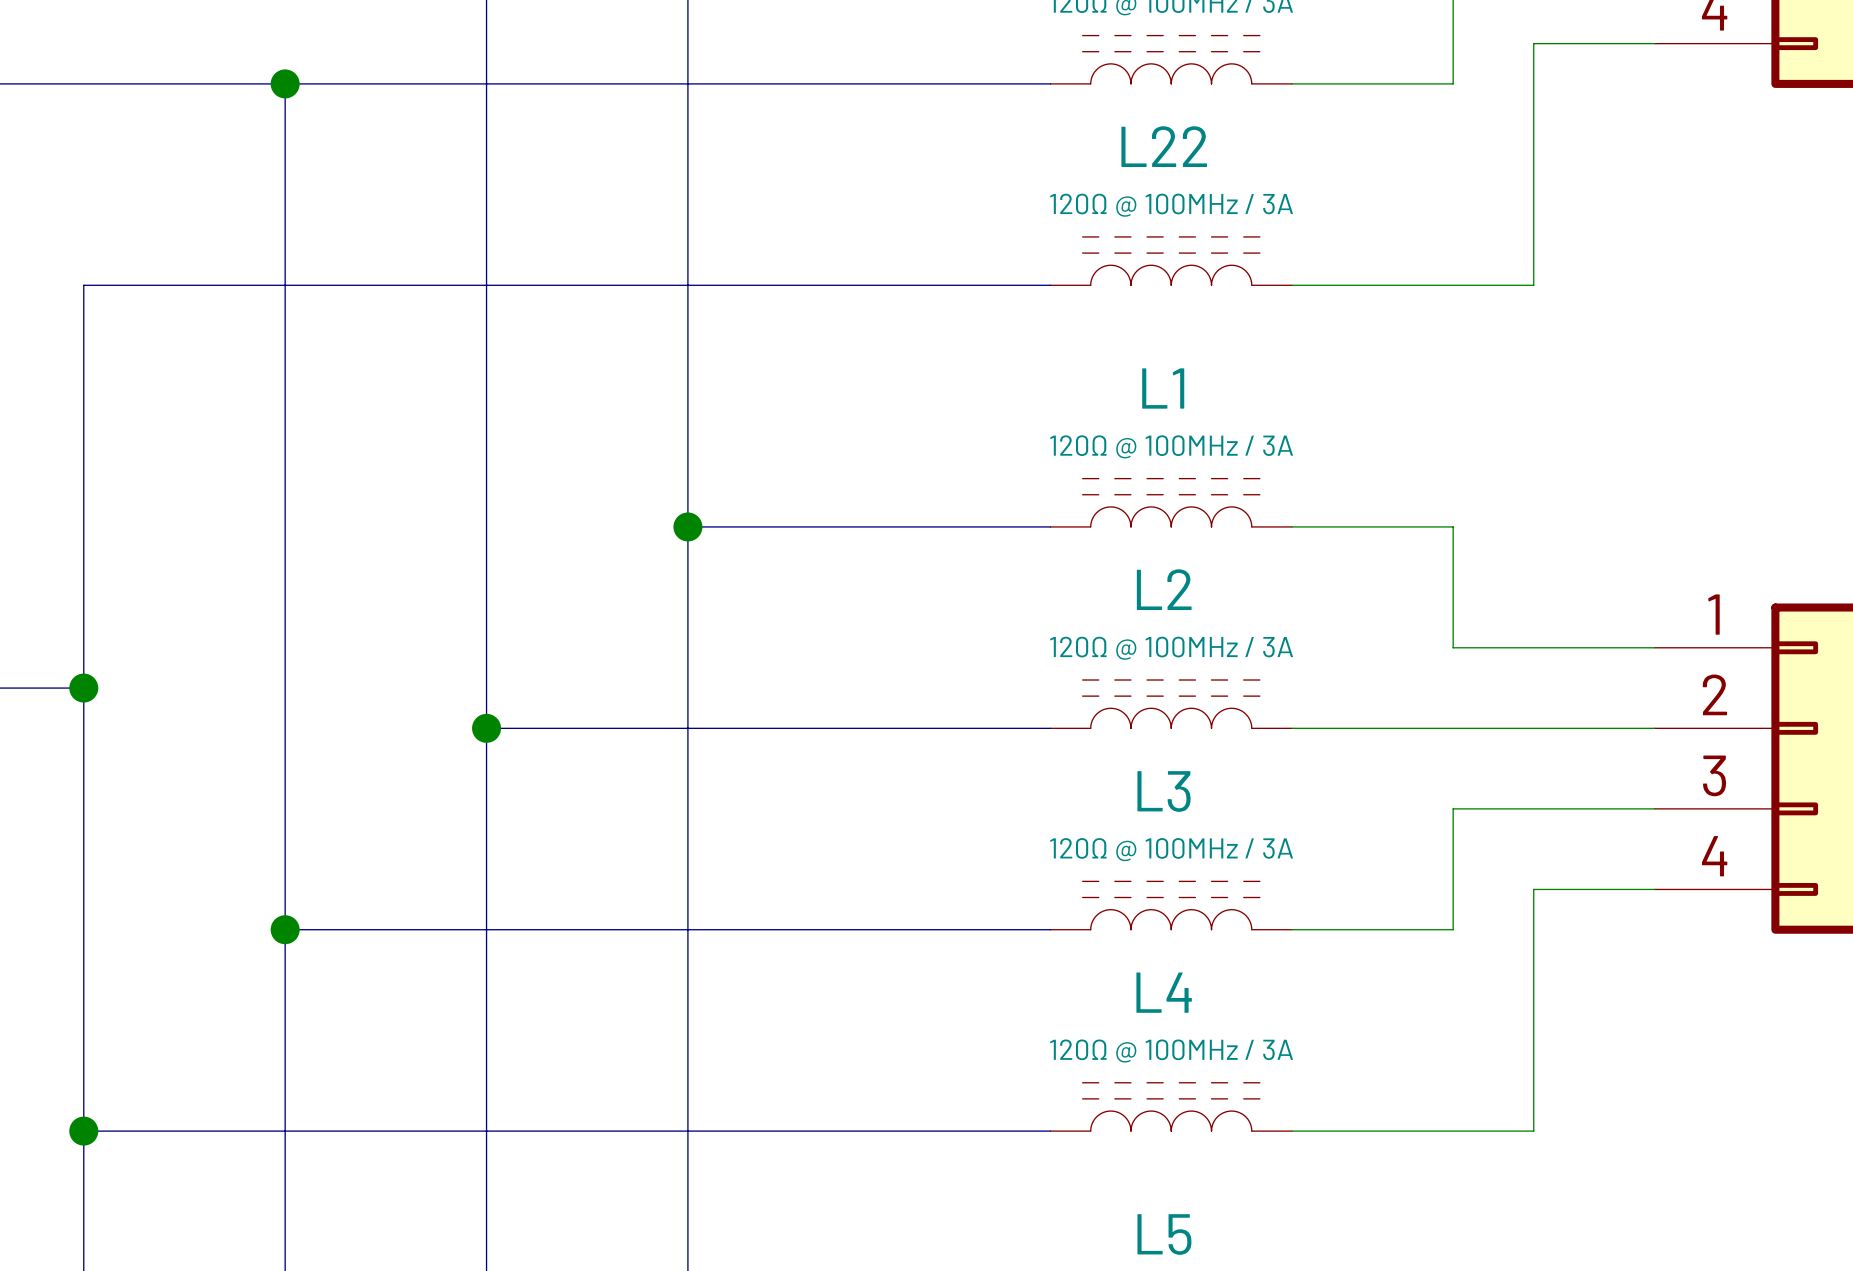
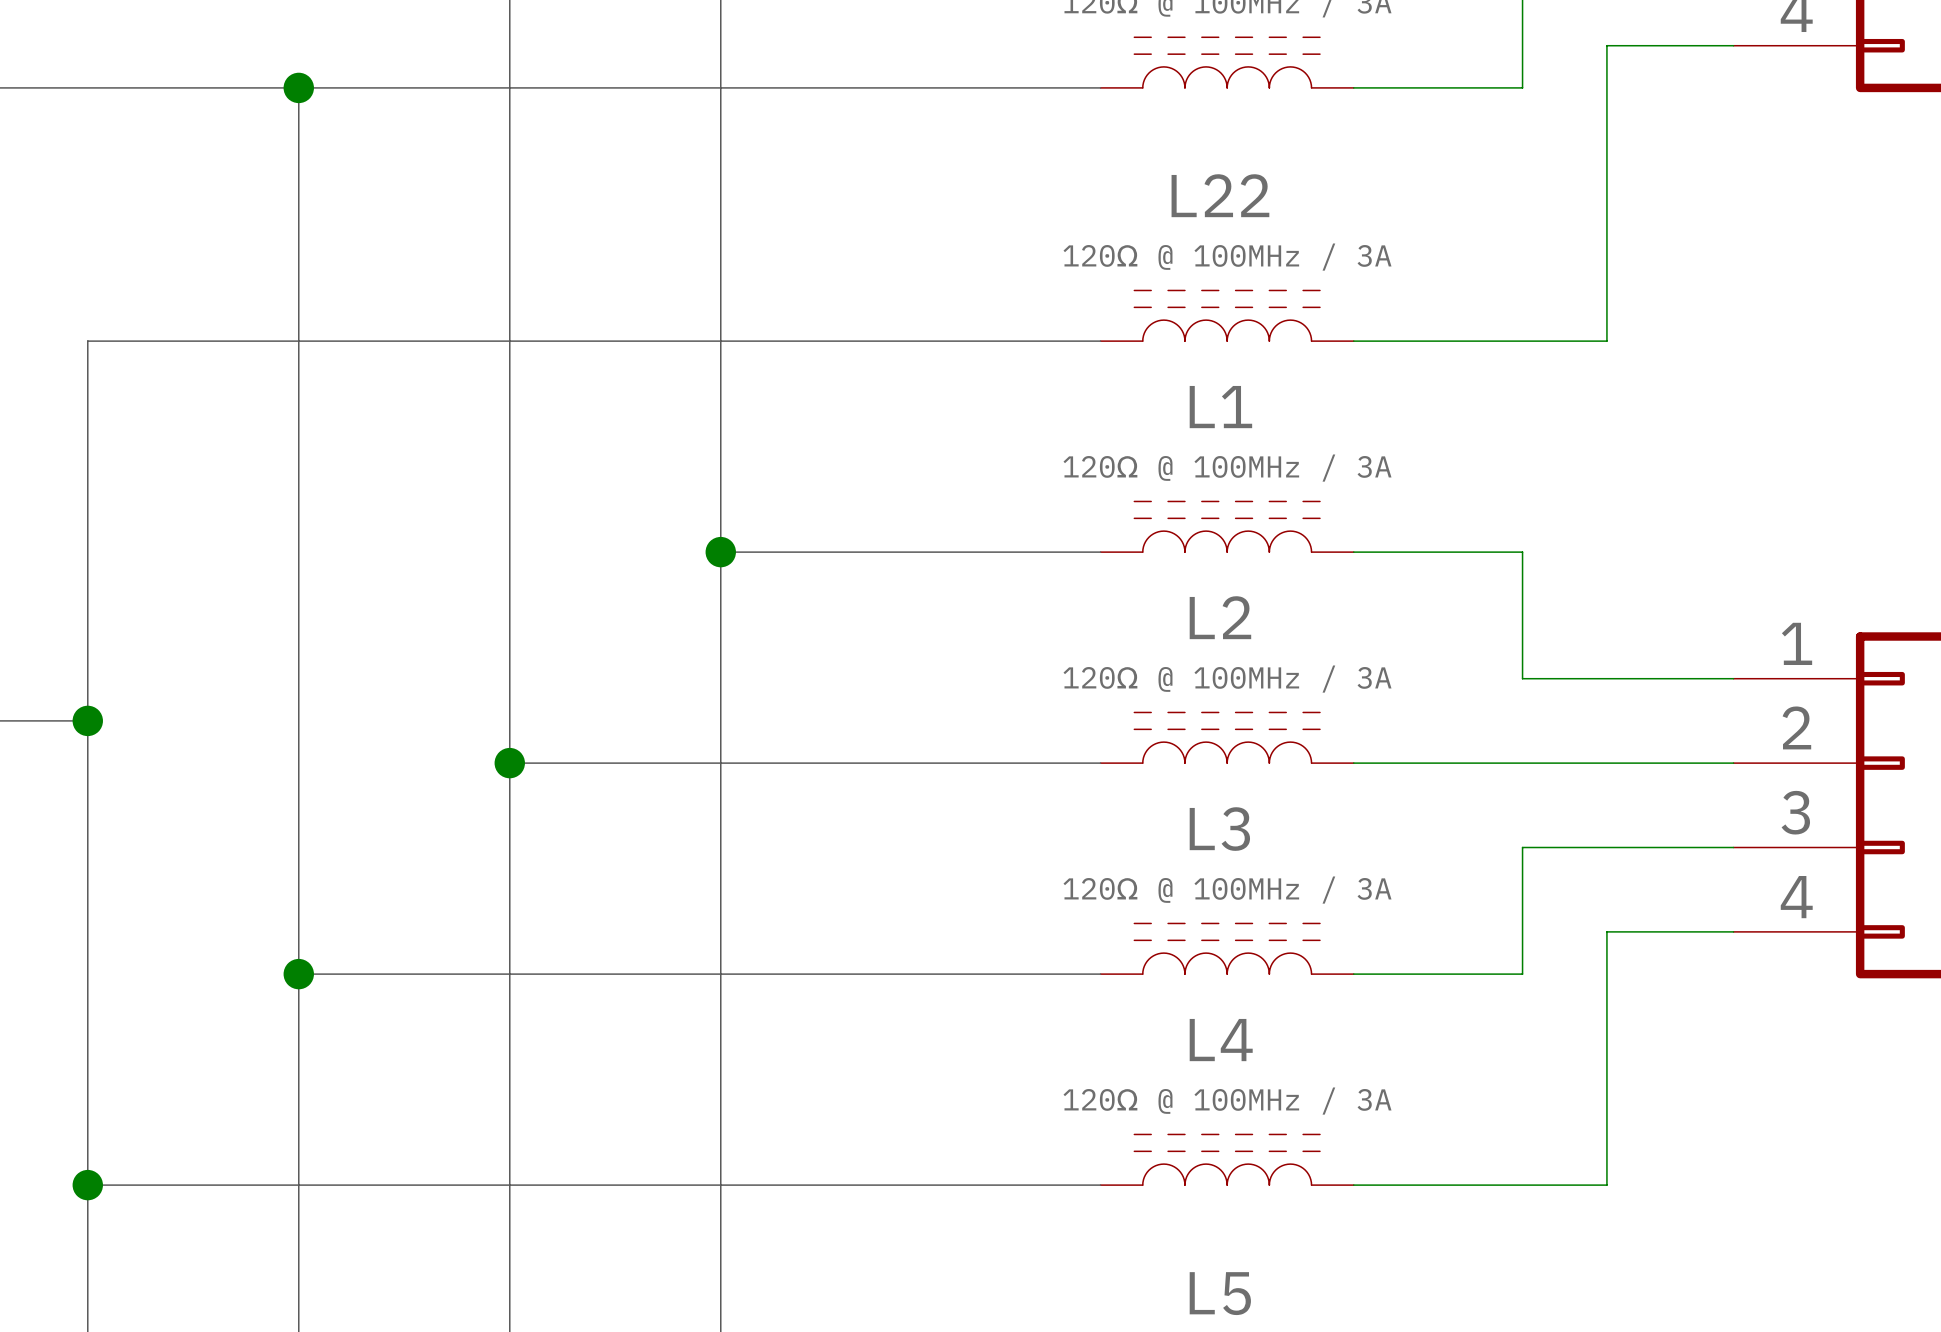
L22 position: (1171, 261) -> (1227, 315)
bus: (1050, 285) (83, 285) (83, 325) -> (1100, 341) (87, 341)
wire: (1292, 285) (1533, 285) -> (1353, 341) (1606, 341) (1606, 298)

